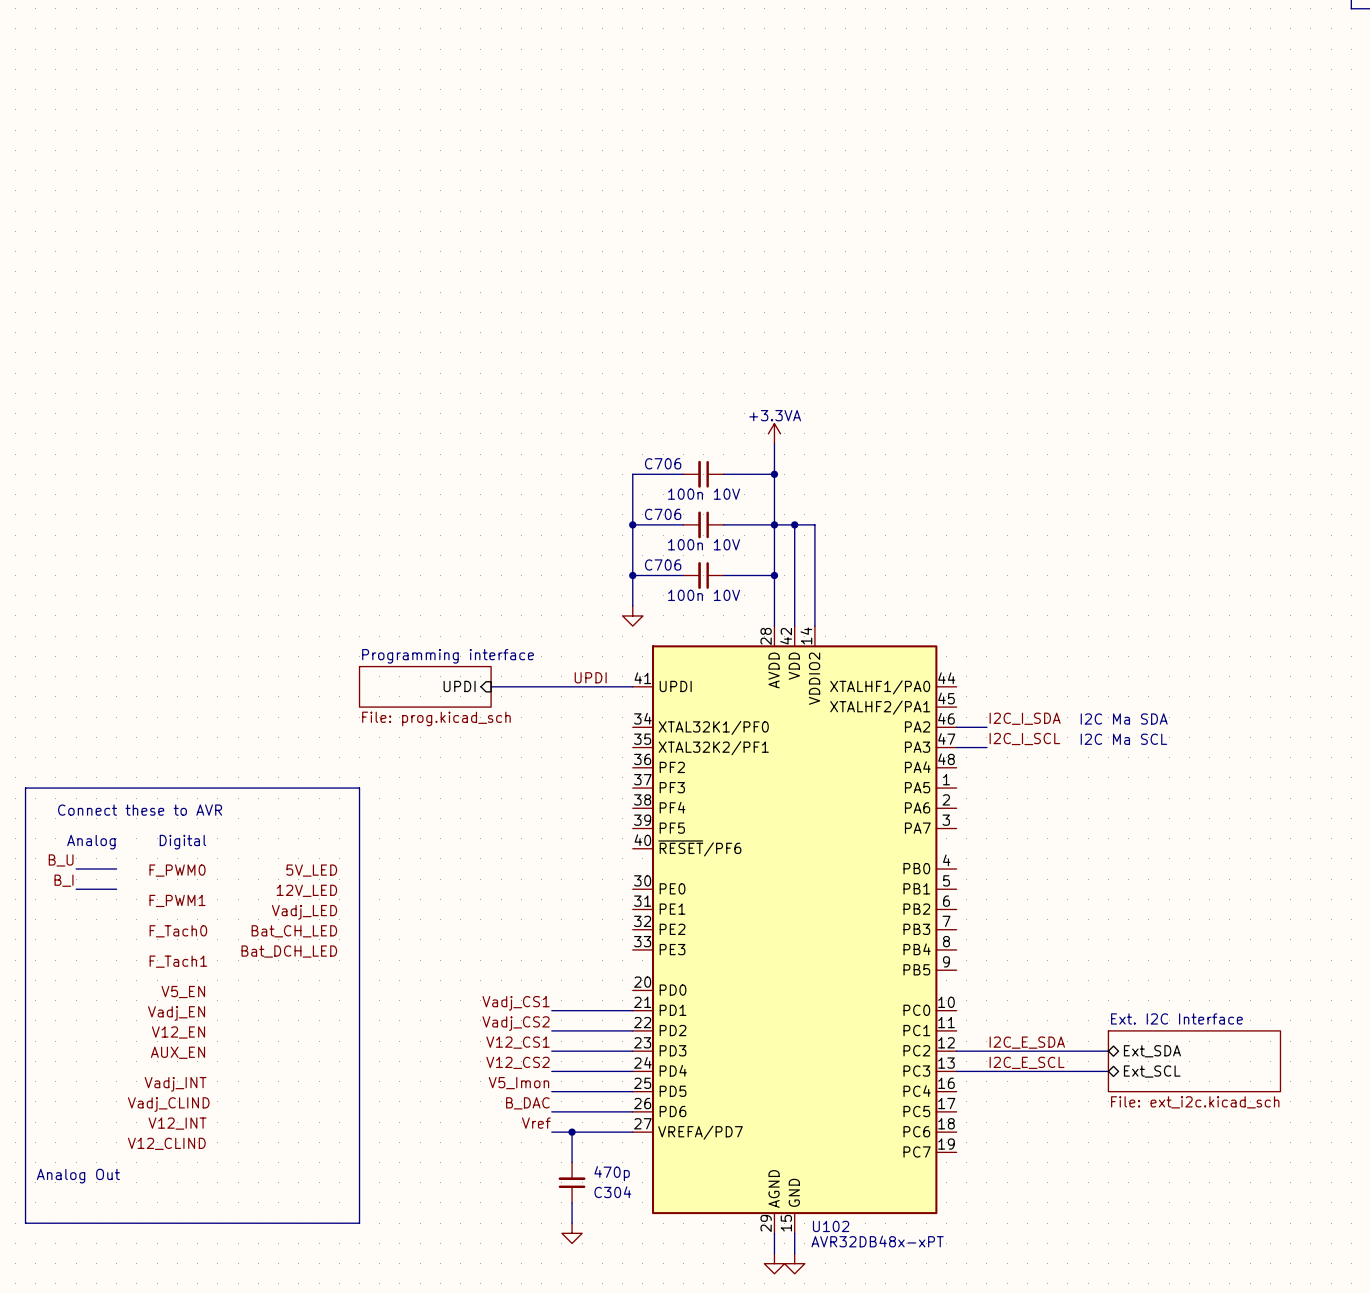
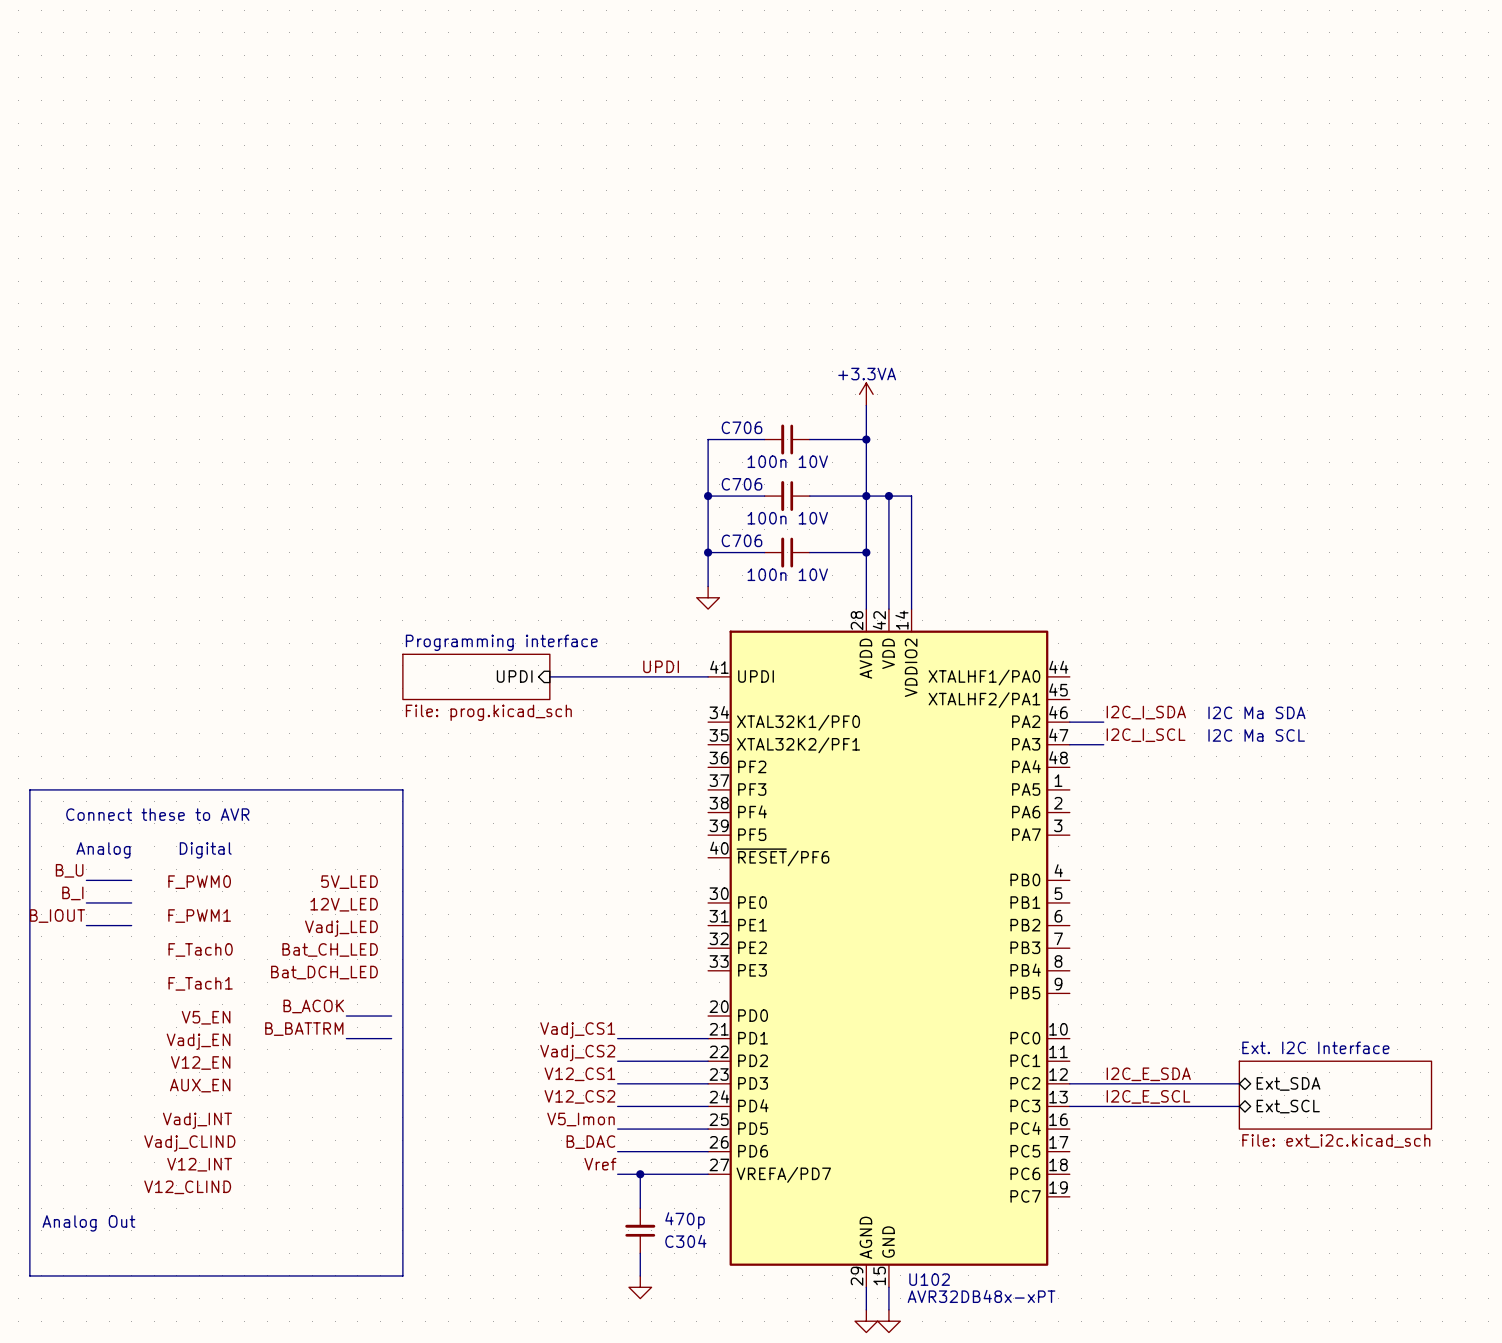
label: none -> B_IOUT (57, 916)
wire: none -> (86, 925) (131, 925)
label: none -> B_ACOK (313, 1006)
wire: none -> (346, 1016) (391, 1016)
label: none -> B_BATTRM (304, 1029)
wire: none -> (346, 1038) (391, 1038)

